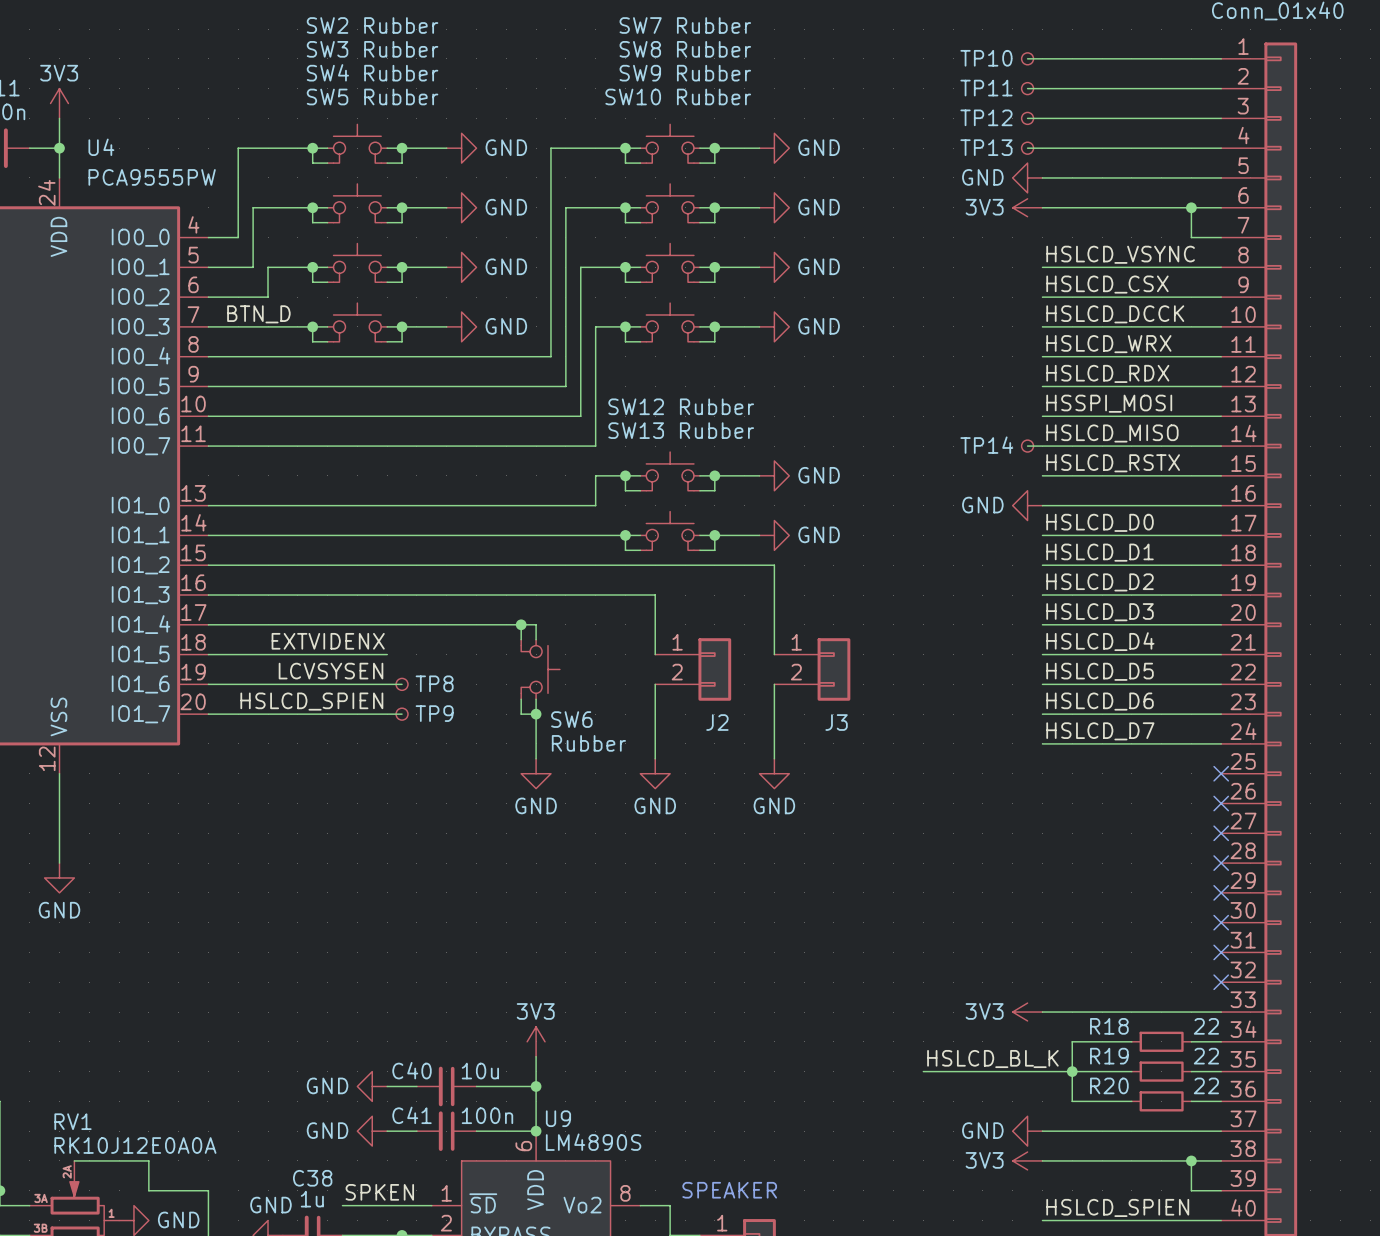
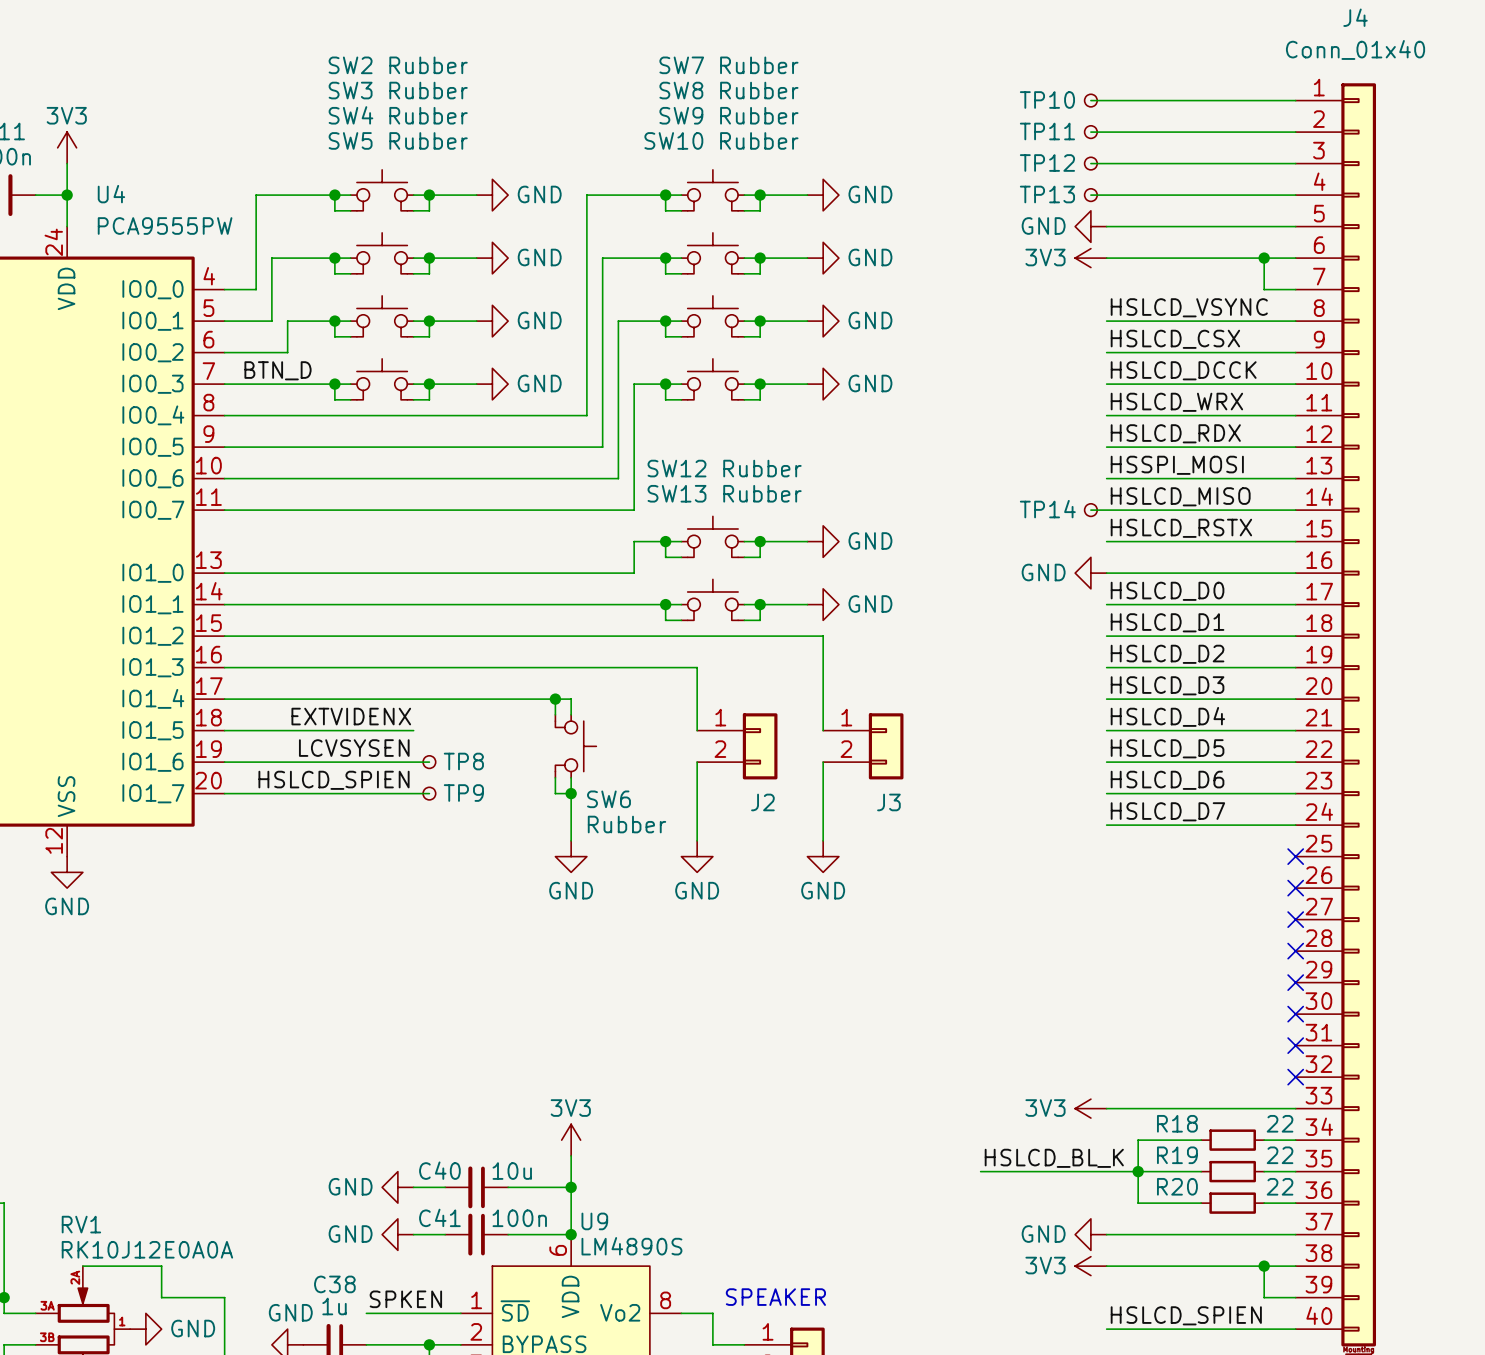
wire: (59, 773) (59, 863) -> none
power symbol position: GND (59, 877) -> GND (67, 872)

